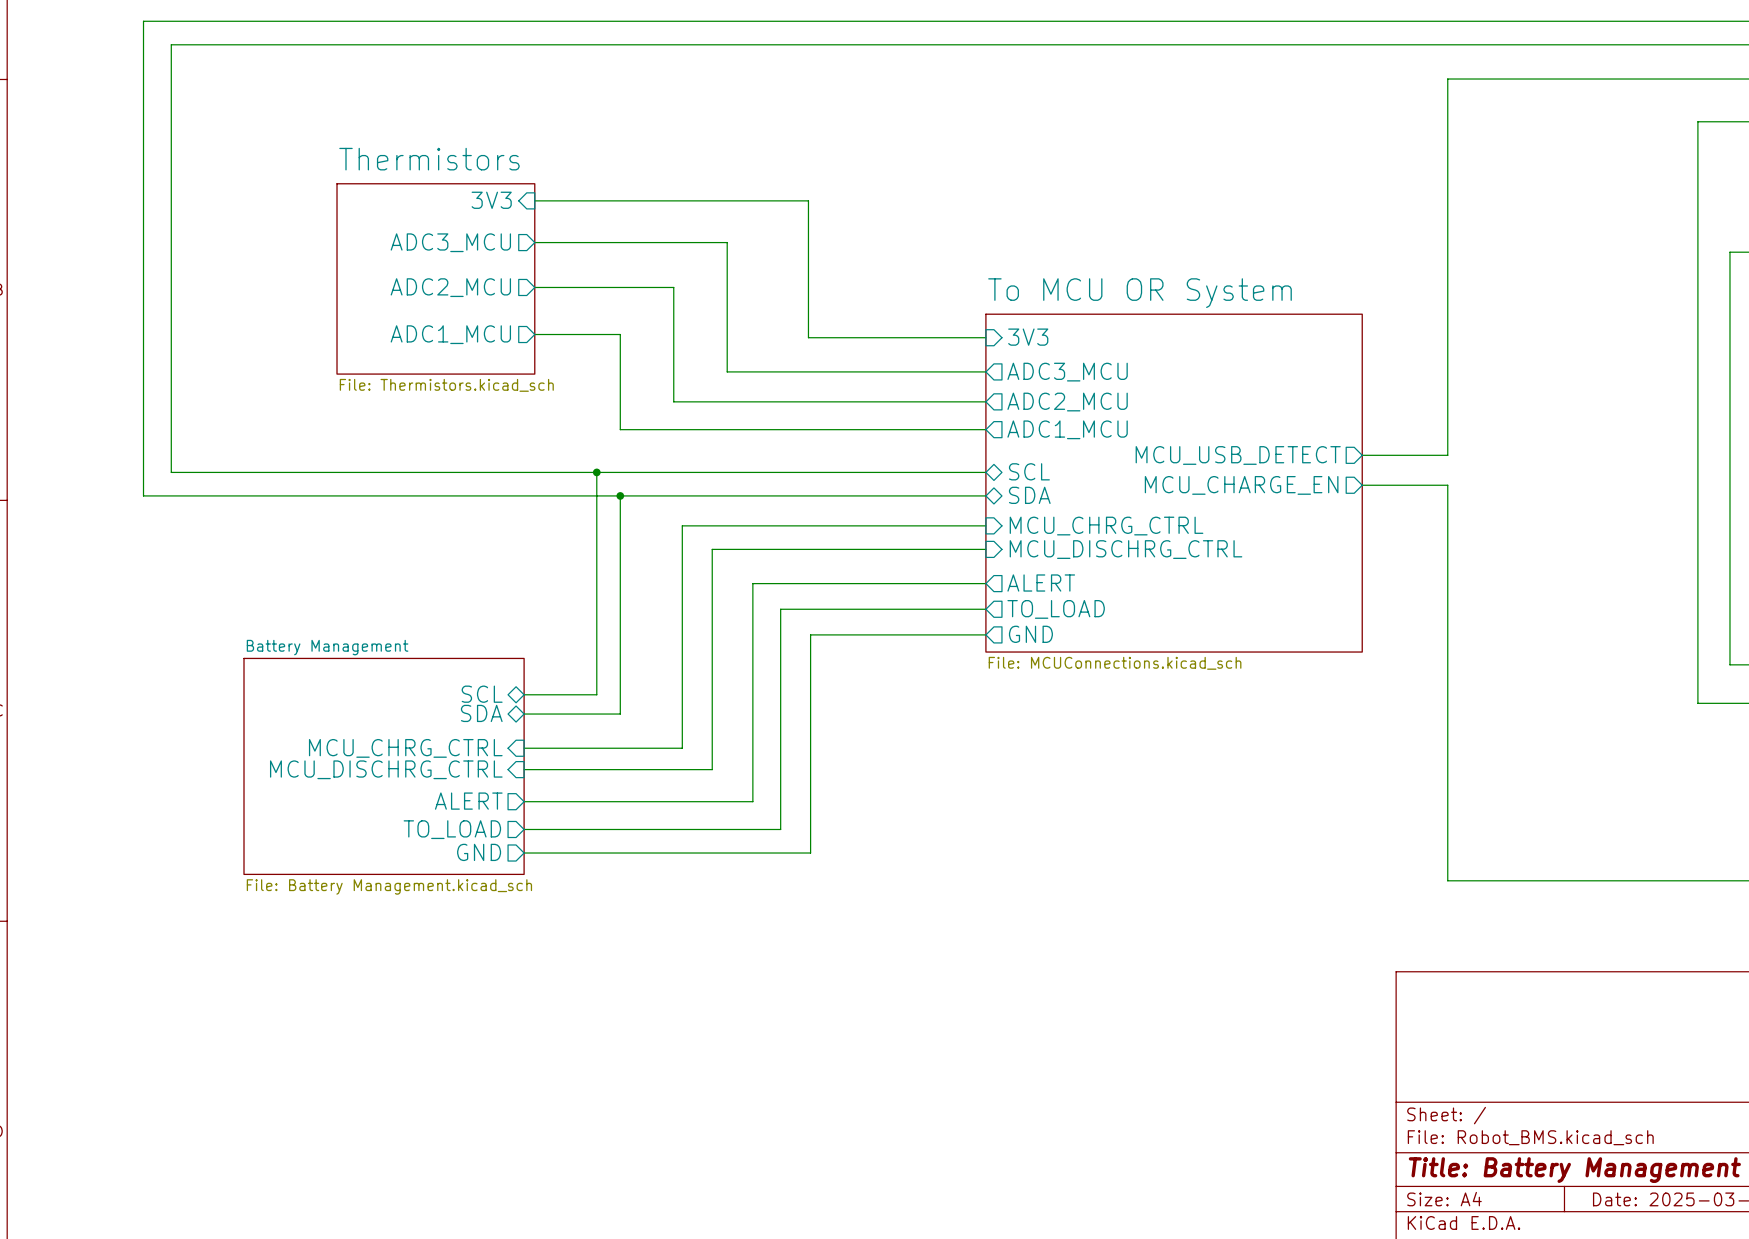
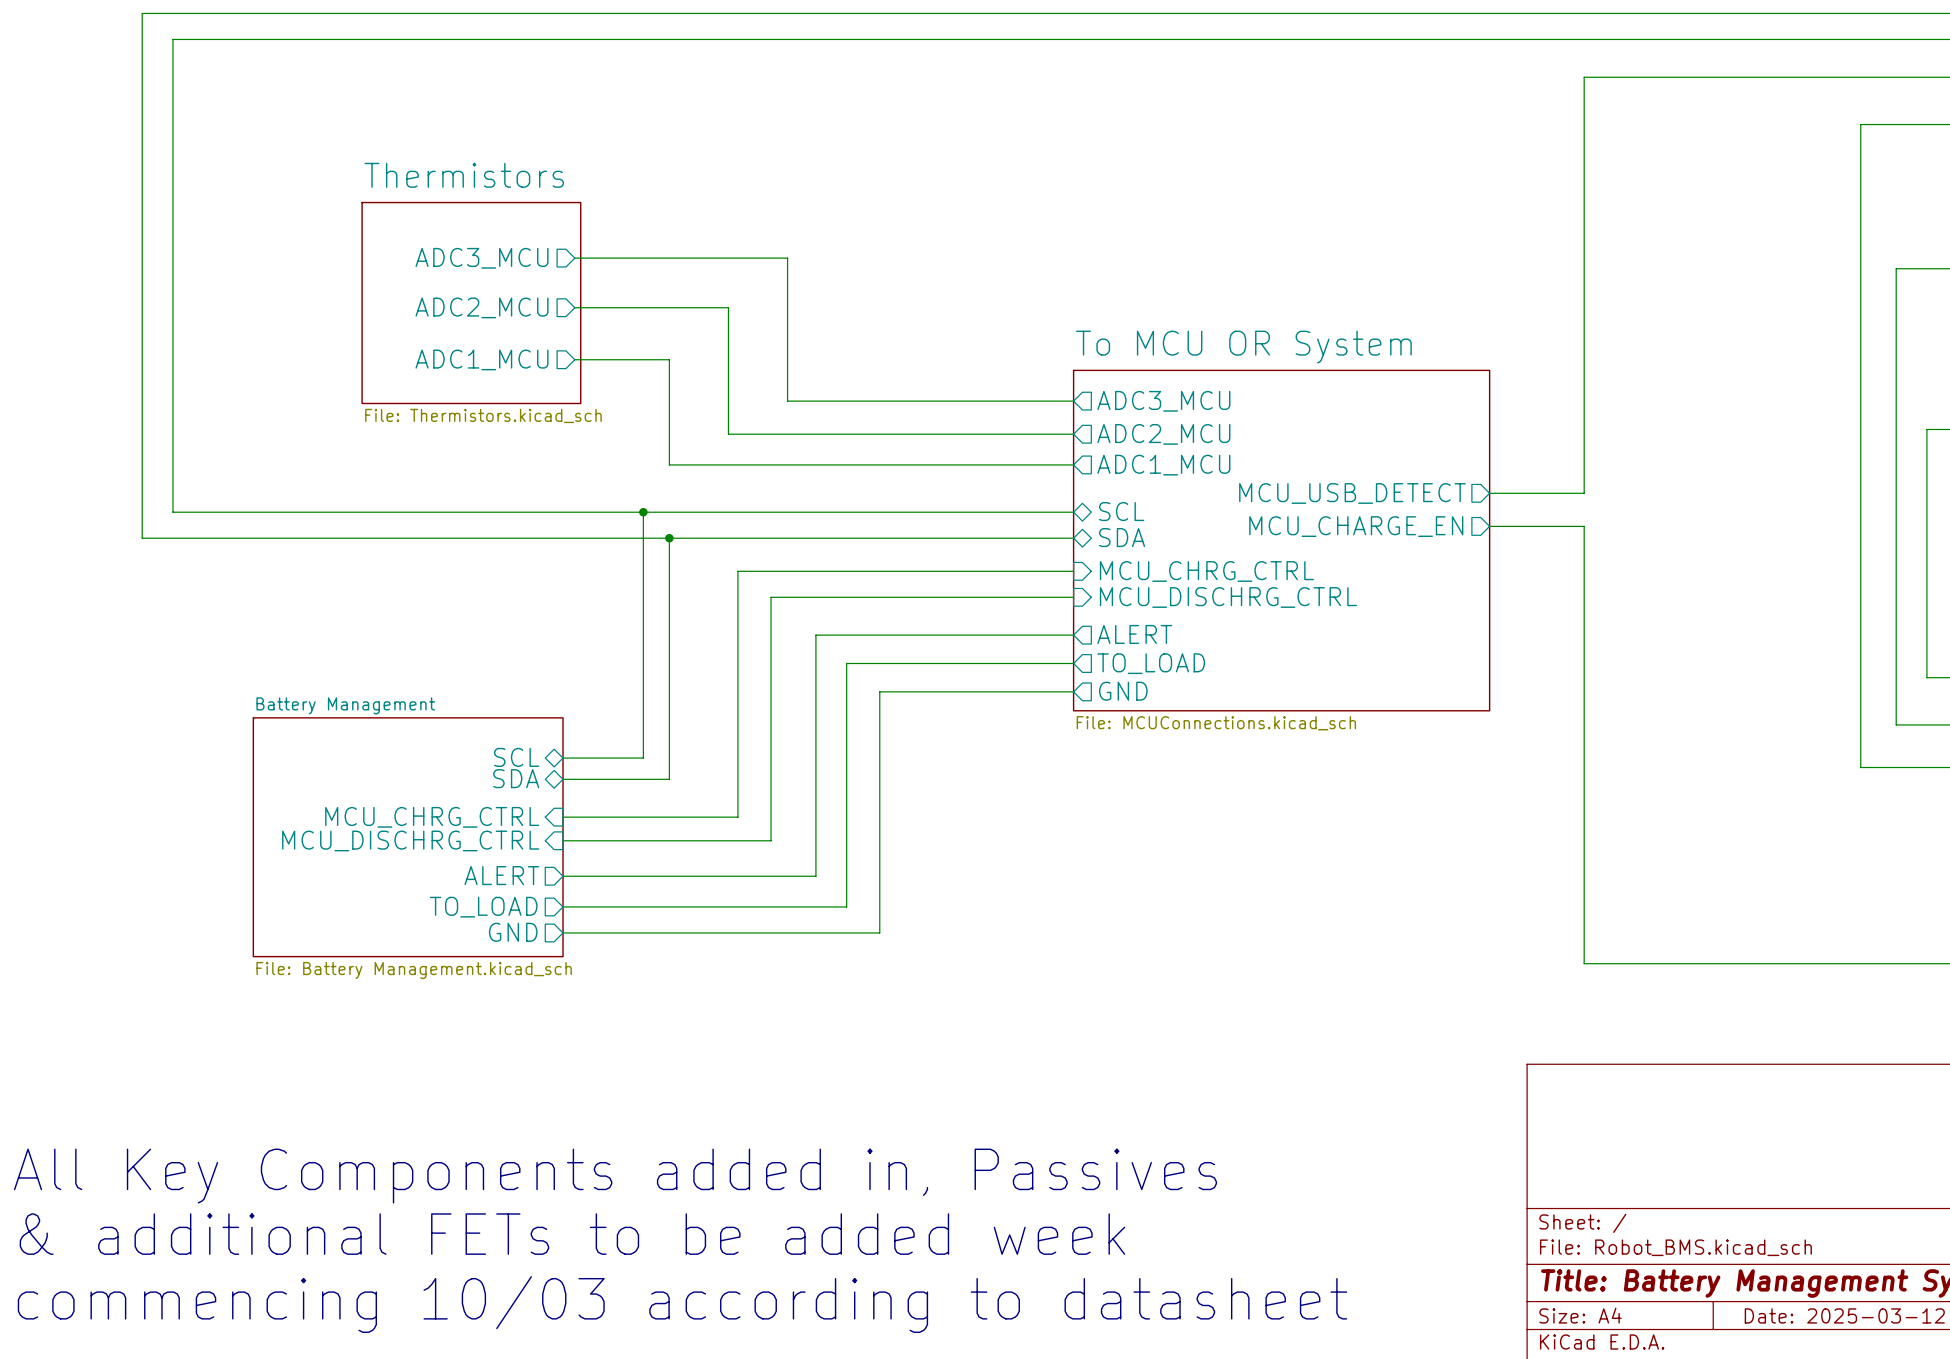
sheet Thermistors shape: [336, 183, 536, 375] -> [361, 201, 582, 405]
sheet pin: 3V3 (491, 200) -> none
wire: (534, 200) (808, 200) (808, 337) (985, 337) -> none
sheet pin: 3V3 (1028, 337) -> none
sheet To MCU OR System: File: MCUConnections.kicad_sch (1174, 483) -> none
sheet To MCU OR System: none -> File: MCUConnections.kicad_sch (1281, 540)
text: none -> All Key Components added in, Passives (615, 1176)
text: none -> & additional FETs to be added week (572, 1234)
text: none -> commencing 10/03 according to datasheet (682, 1304)

